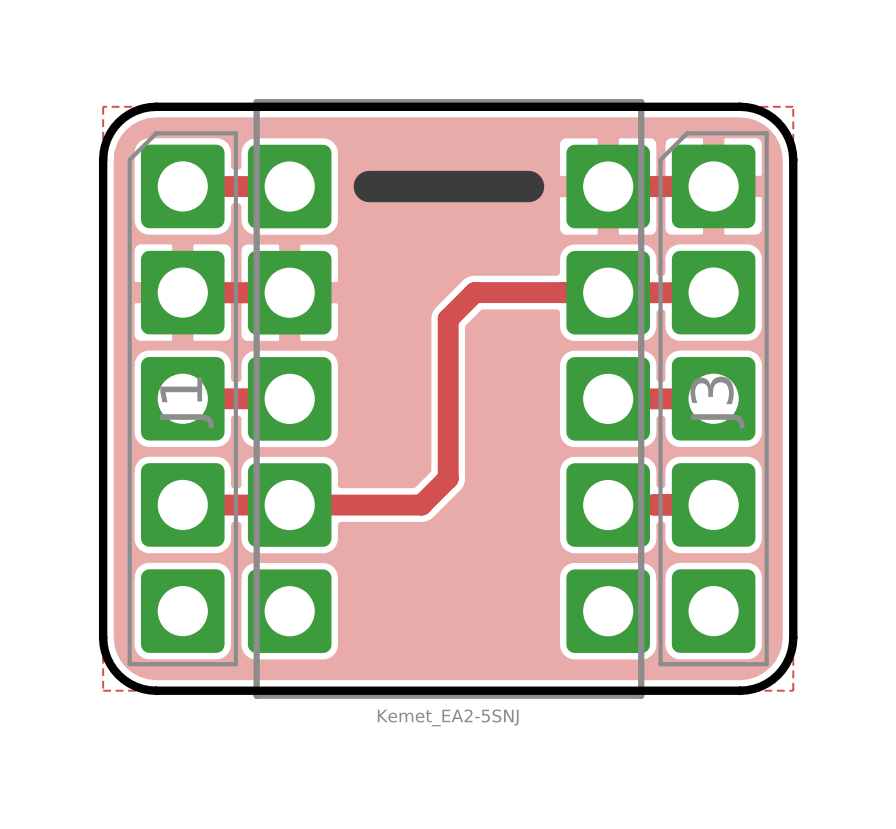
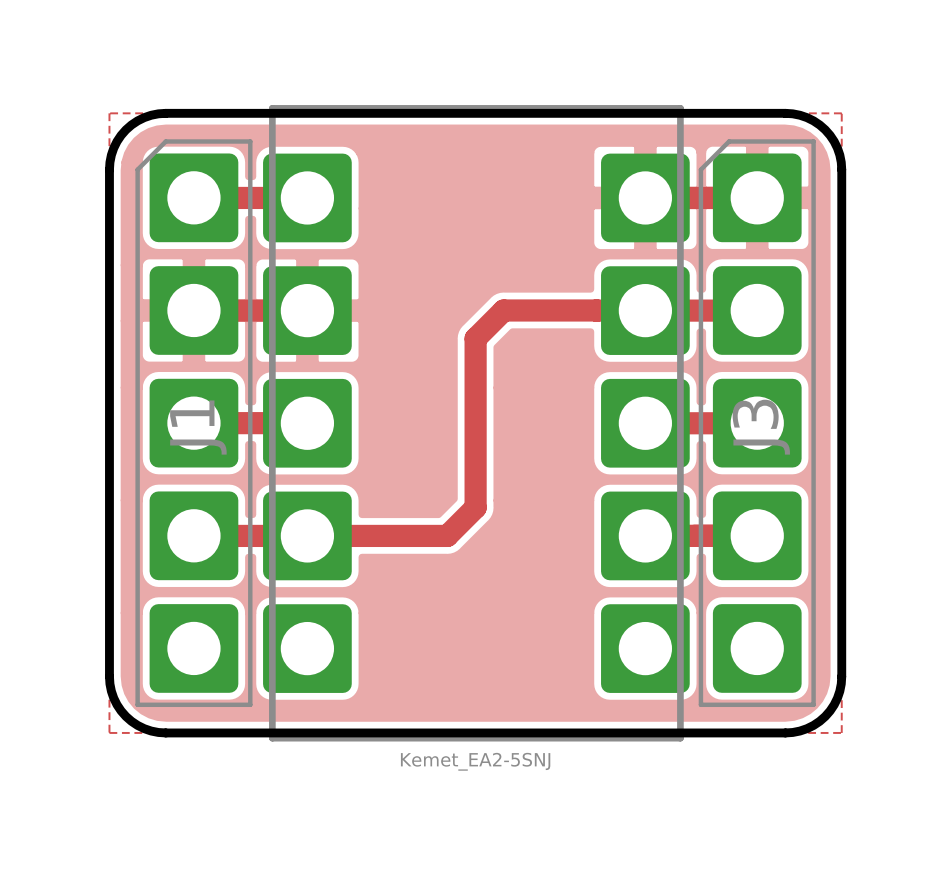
part footprint: [247, 98, 651, 699] -> [263, 105, 690, 742]

